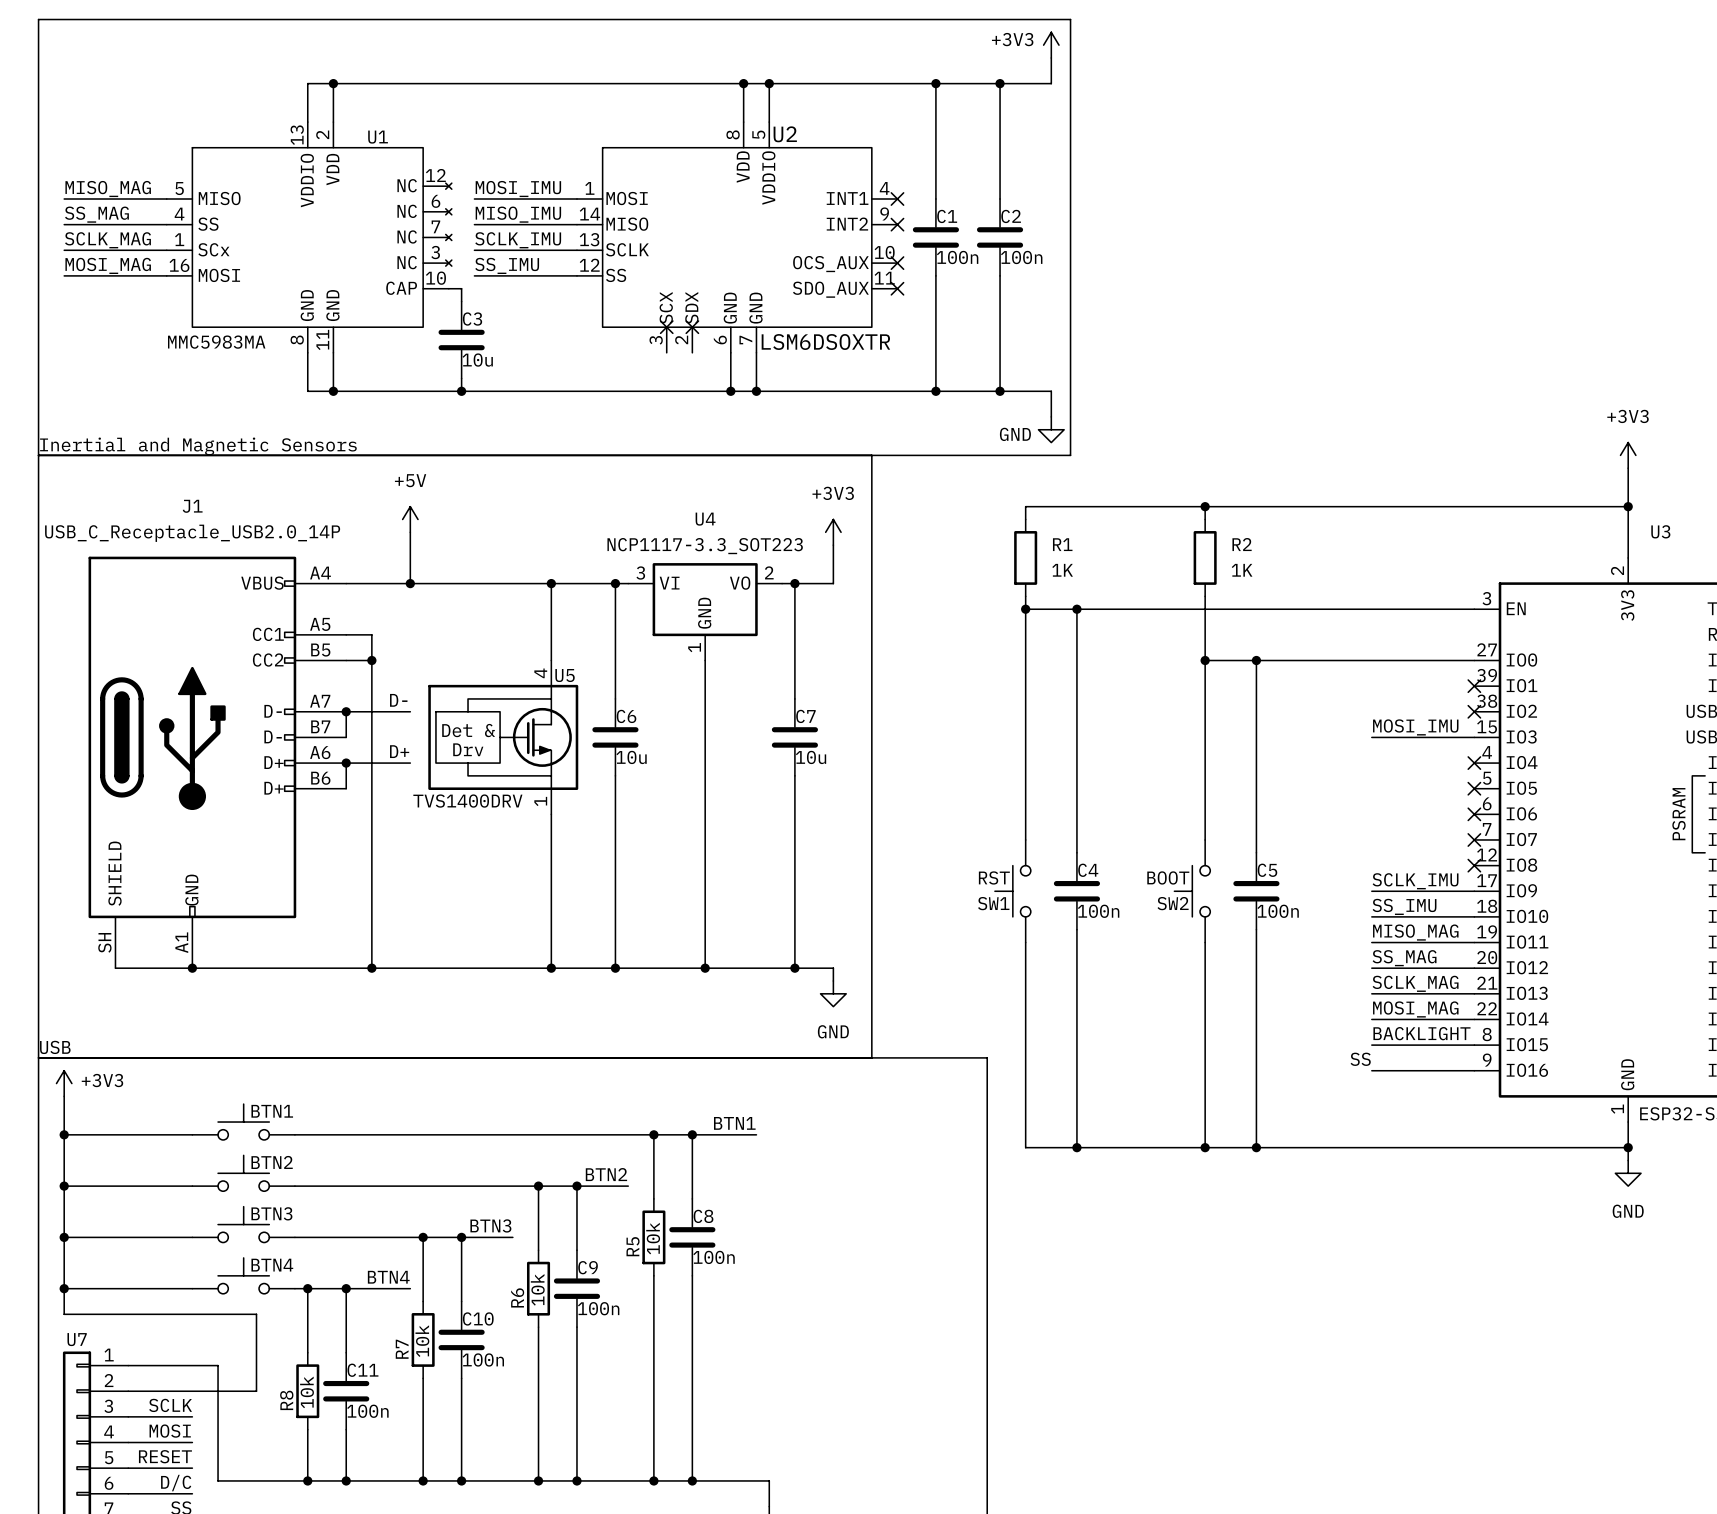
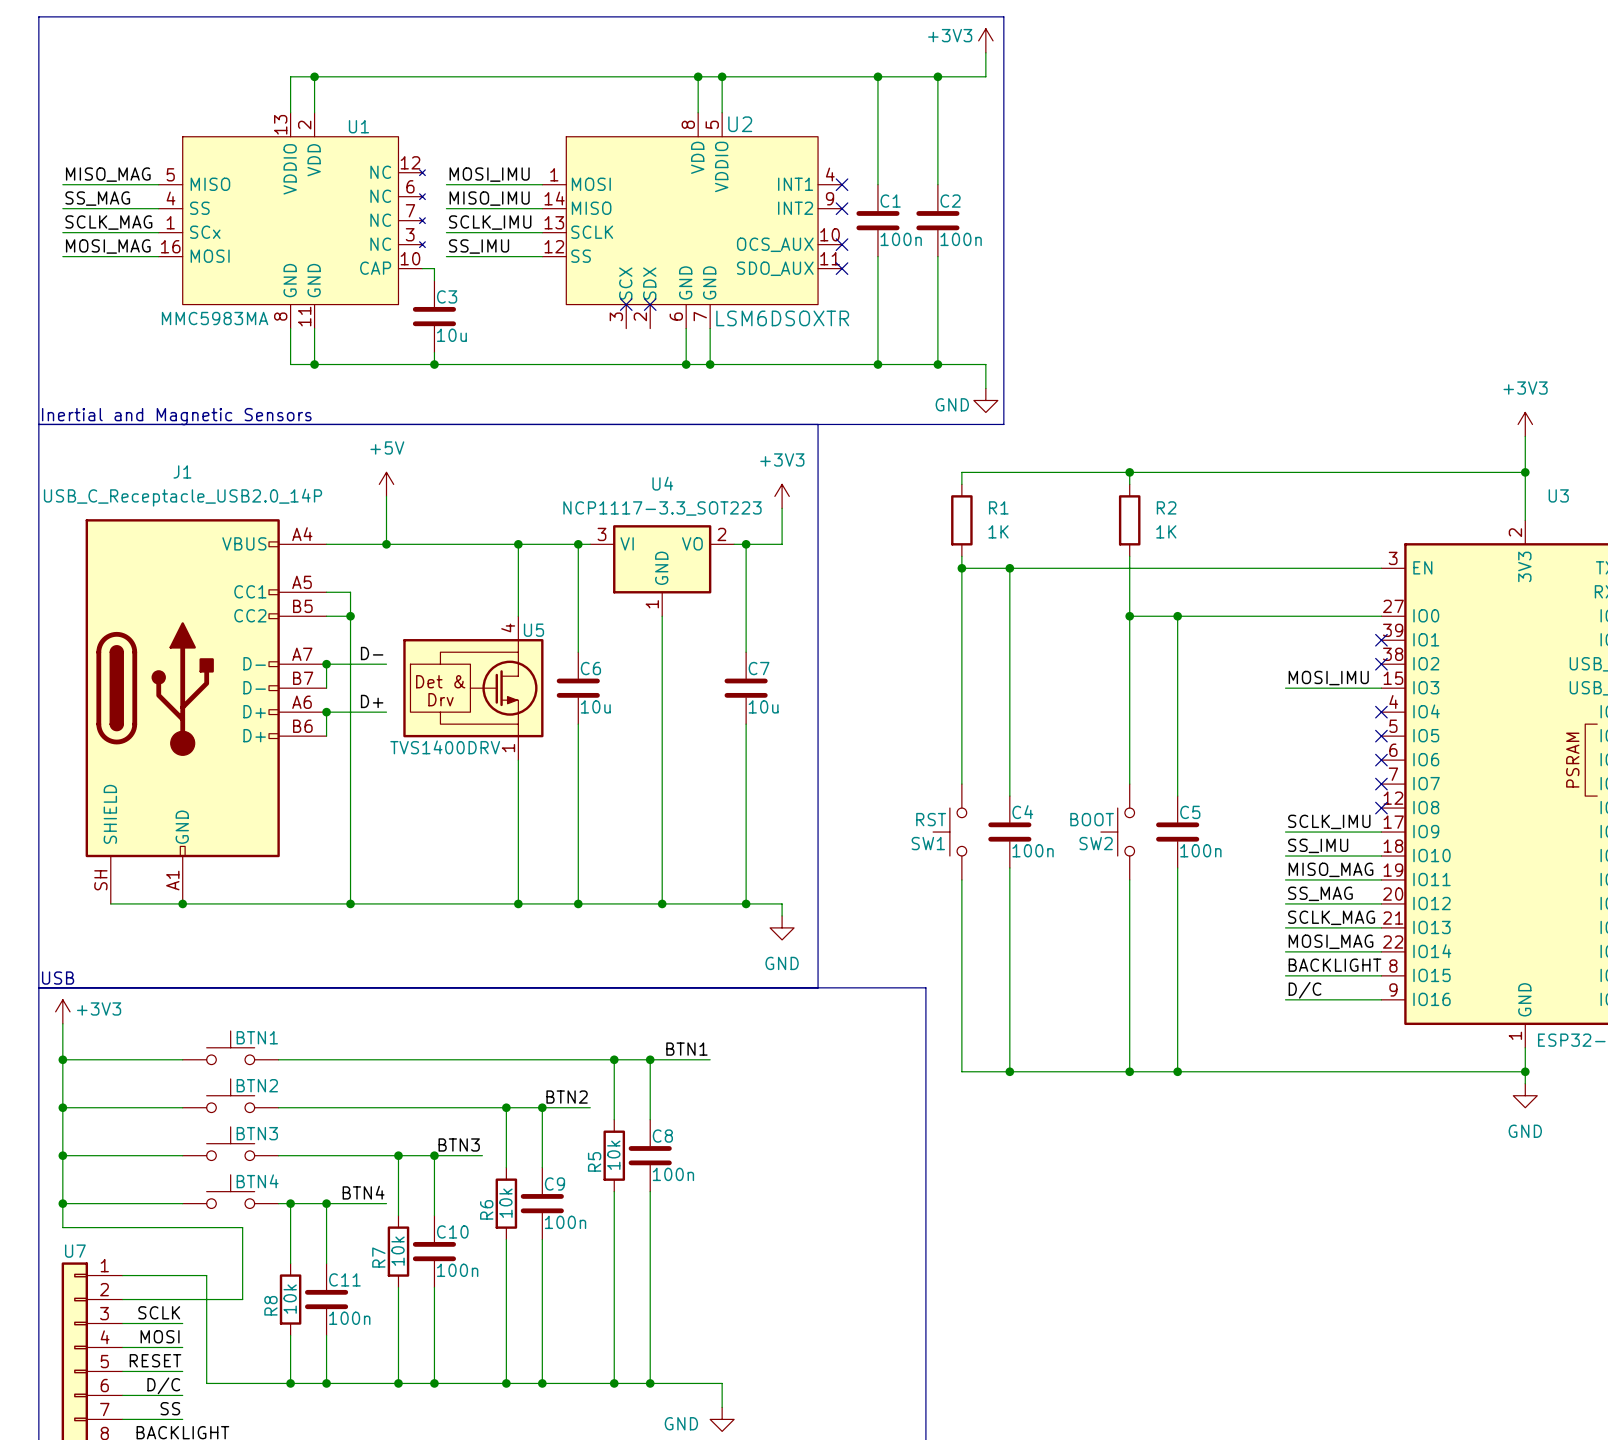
label: SS (1360, 1059) -> D/C (1305, 990)

